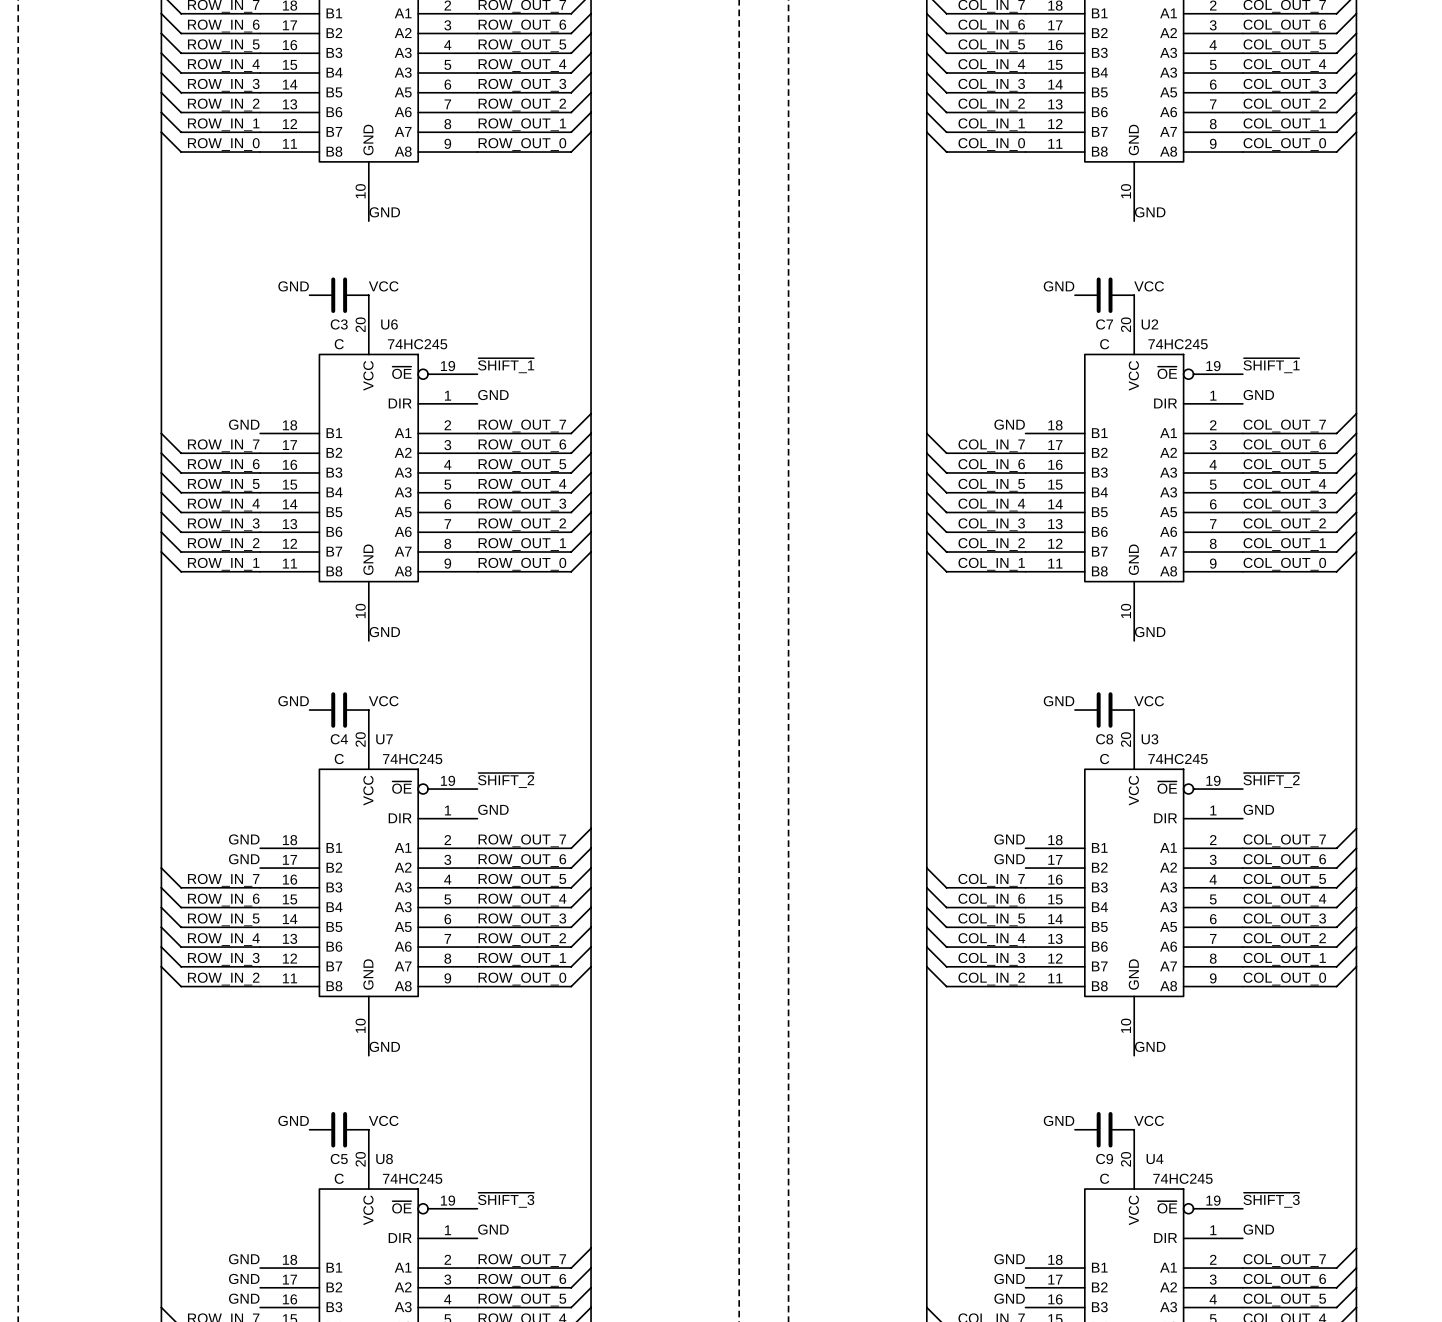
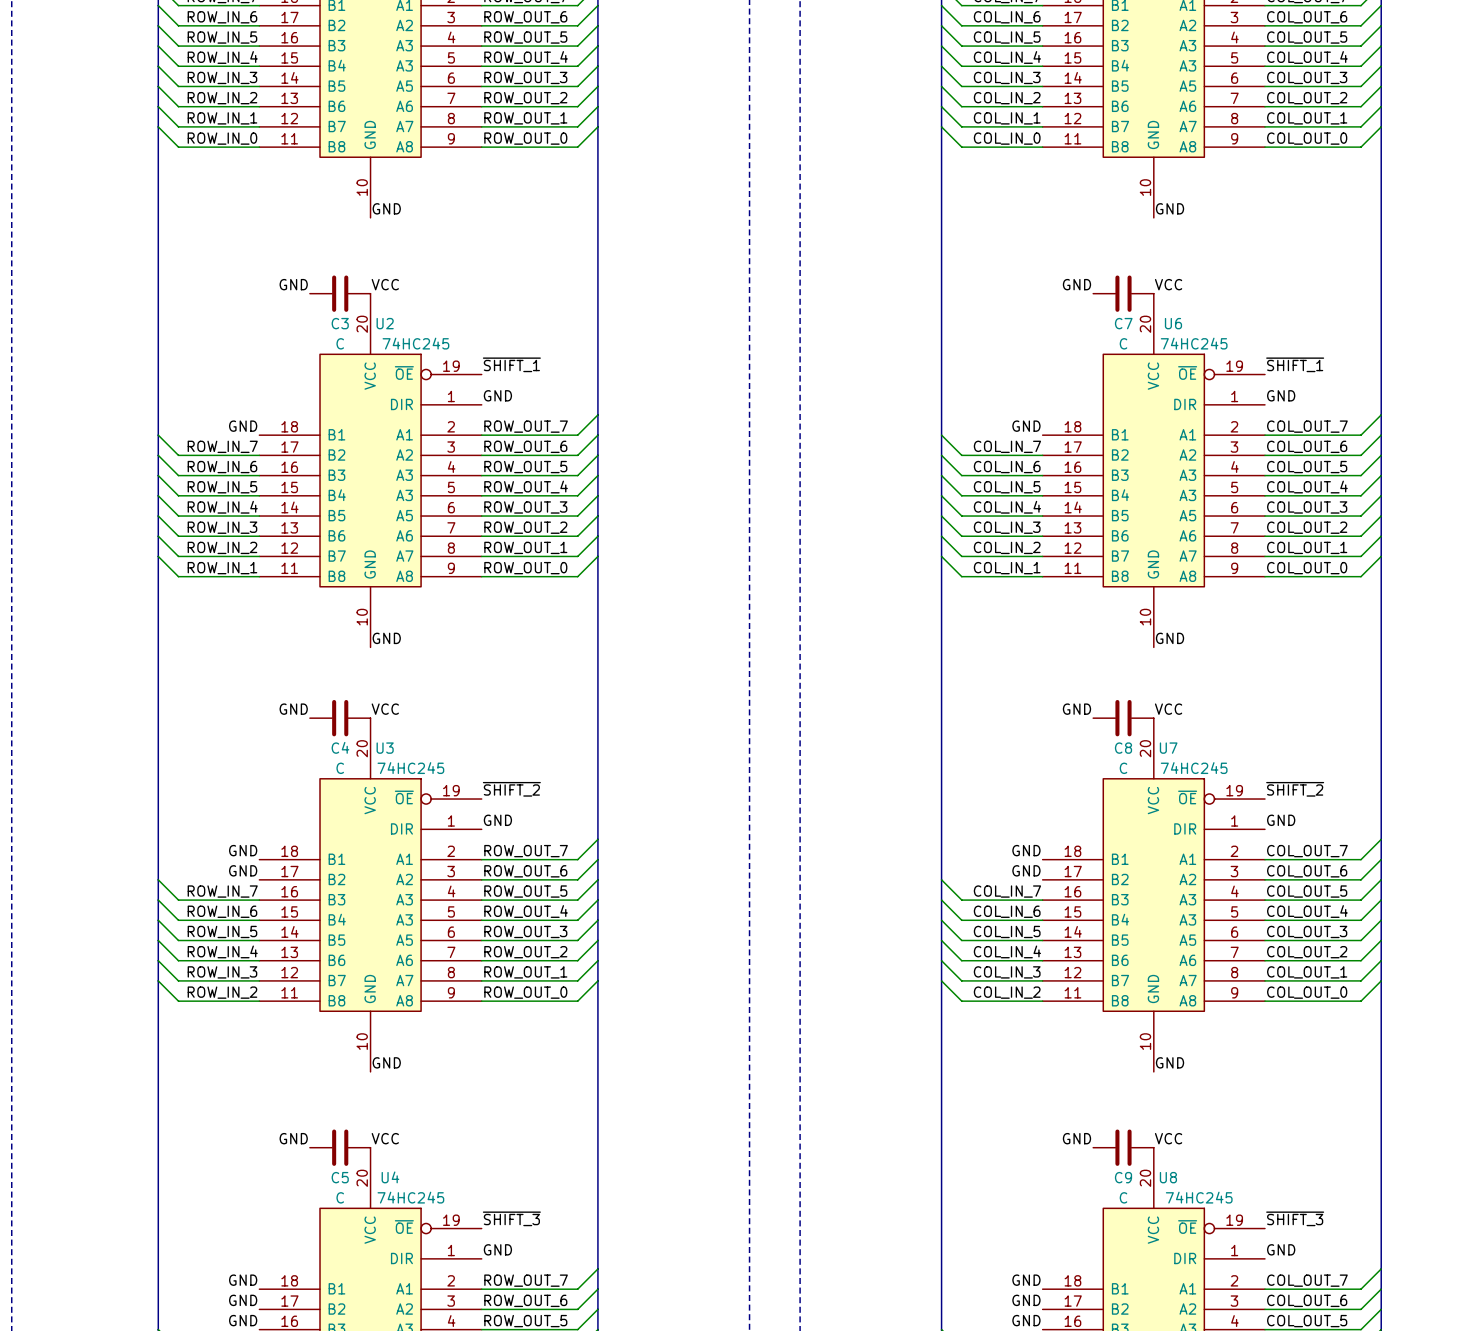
U6 name: U6 (389, 324) -> U2 (385, 323)
U2 name: U2 (1149, 324) -> U6 (1173, 323)
U7 name: U7 (384, 739) -> U3 (385, 748)
U3 name: U3 (1149, 739) -> U7 (1168, 748)
U8 name: U8 (384, 1159) -> U4 (390, 1177)
U4 name: U4 (1155, 1159) -> U8 (1168, 1177)

